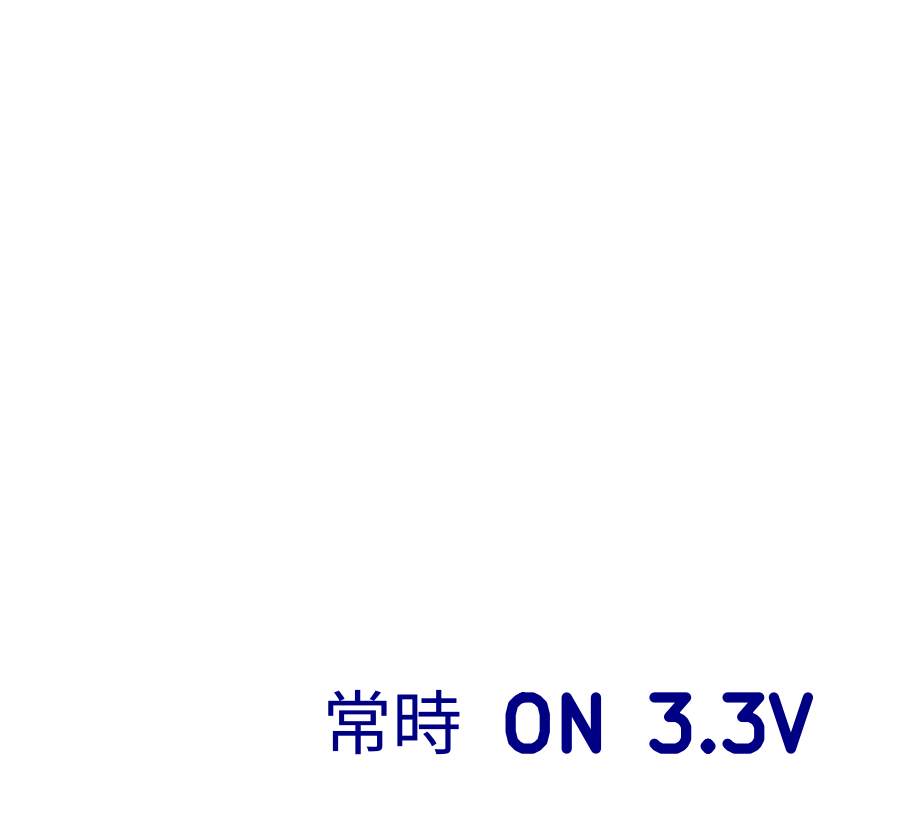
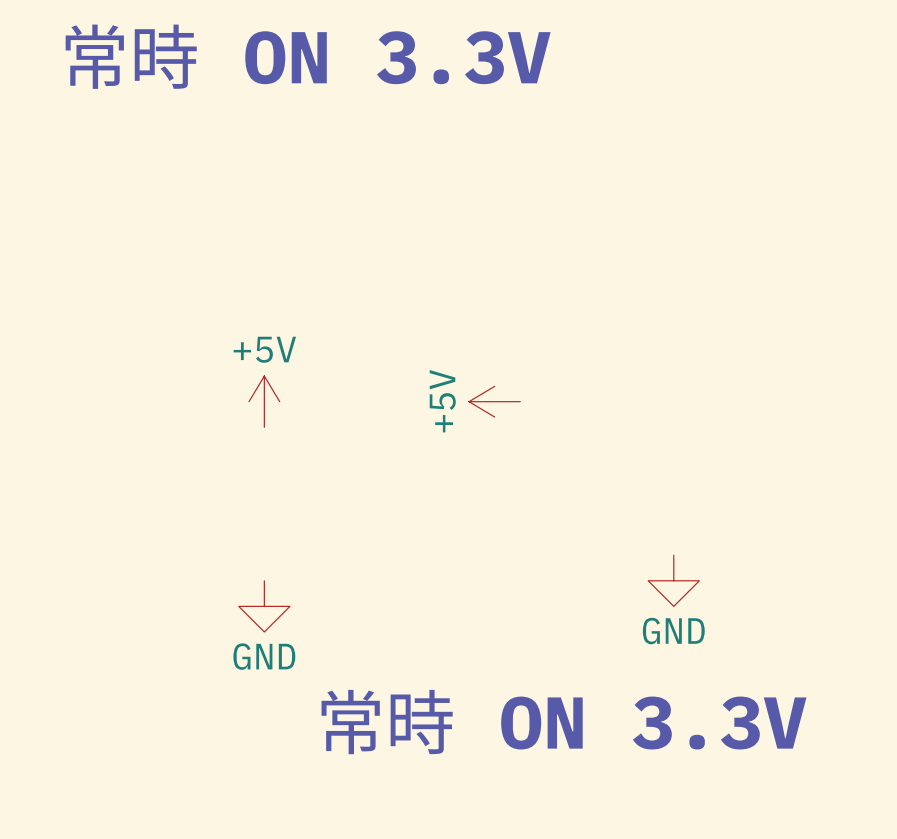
text: none -> 常時 ON 3.3V (308, 56)
power symbol: none -> +5V (264, 401)
power symbol: none -> +5V (494, 401)
power symbol: none -> GND (673, 580)
power symbol: none -> GND (264, 606)

